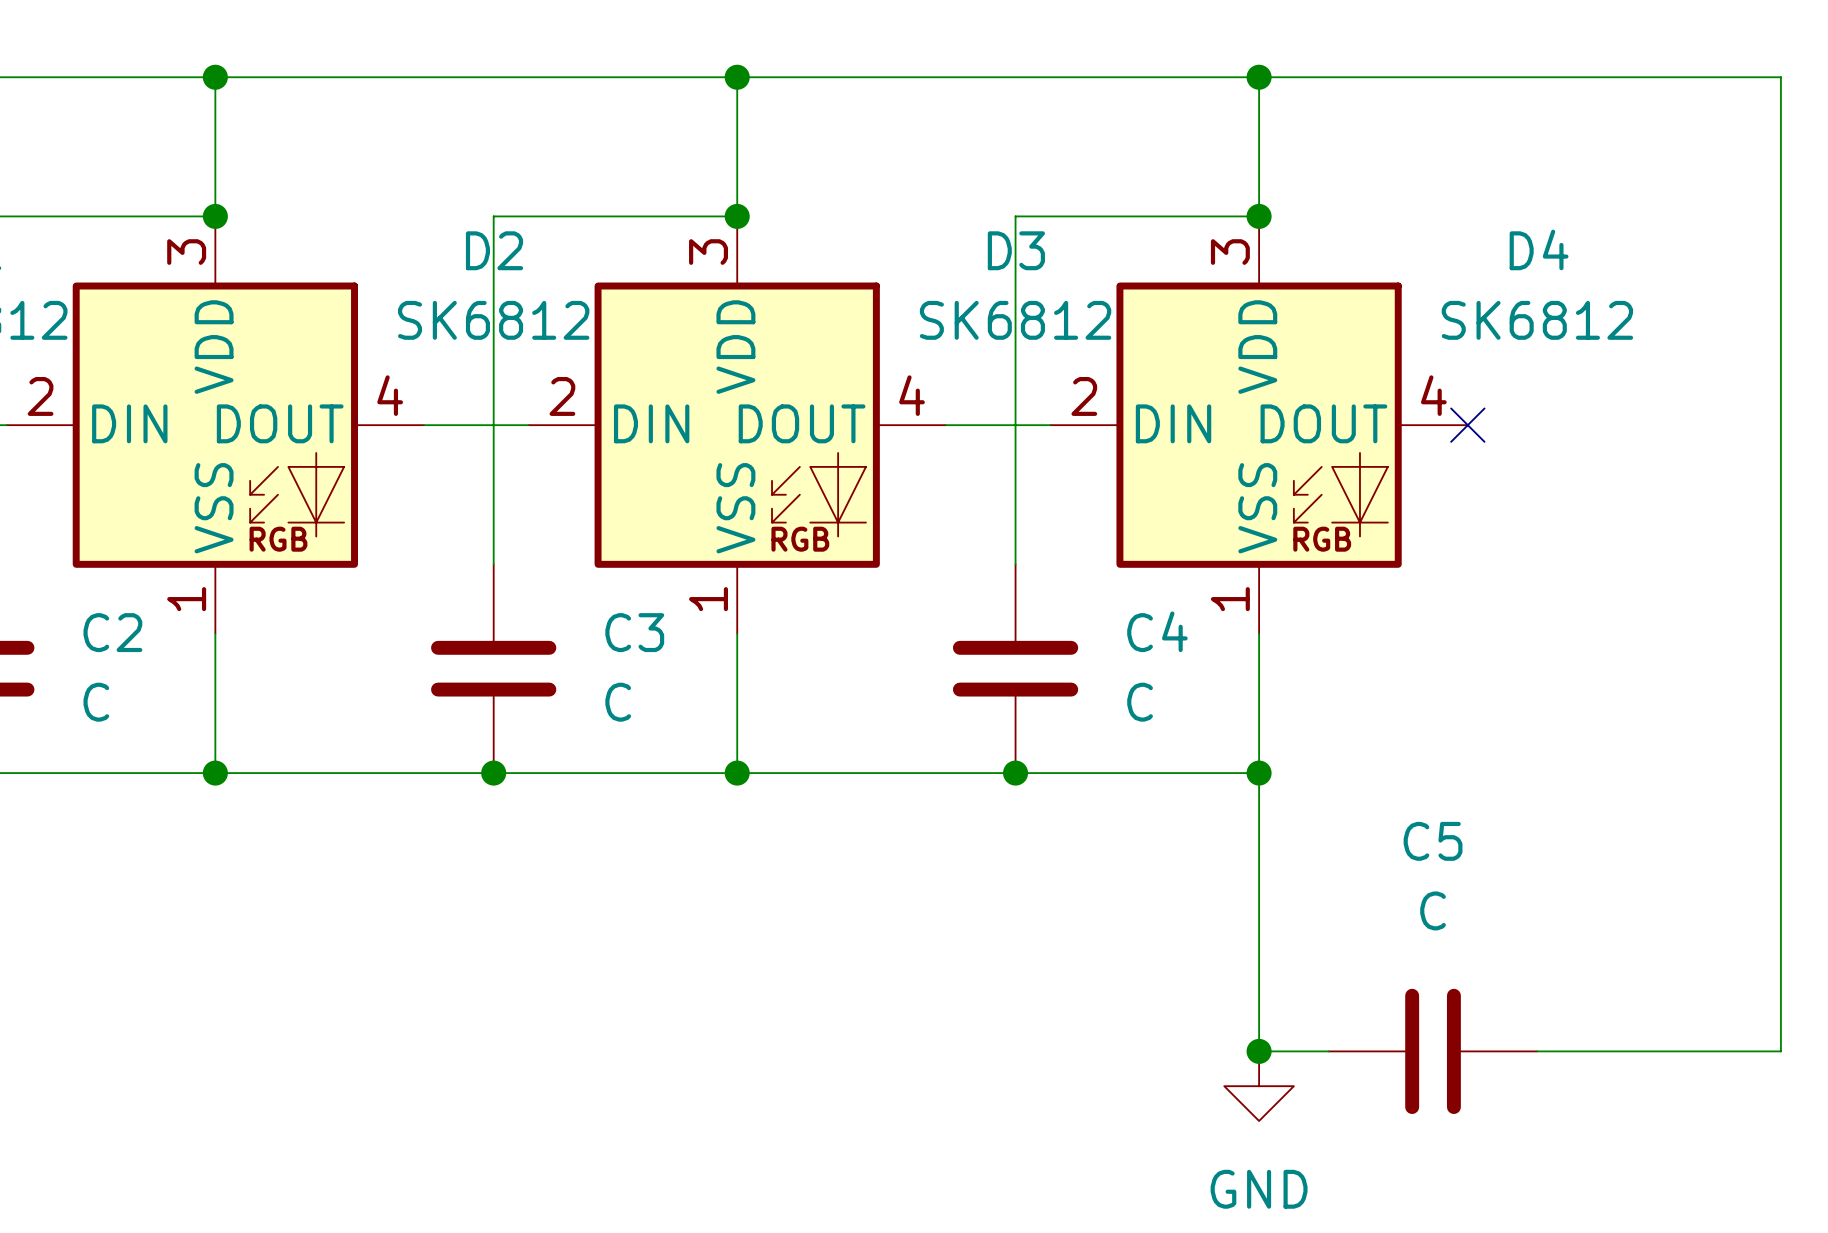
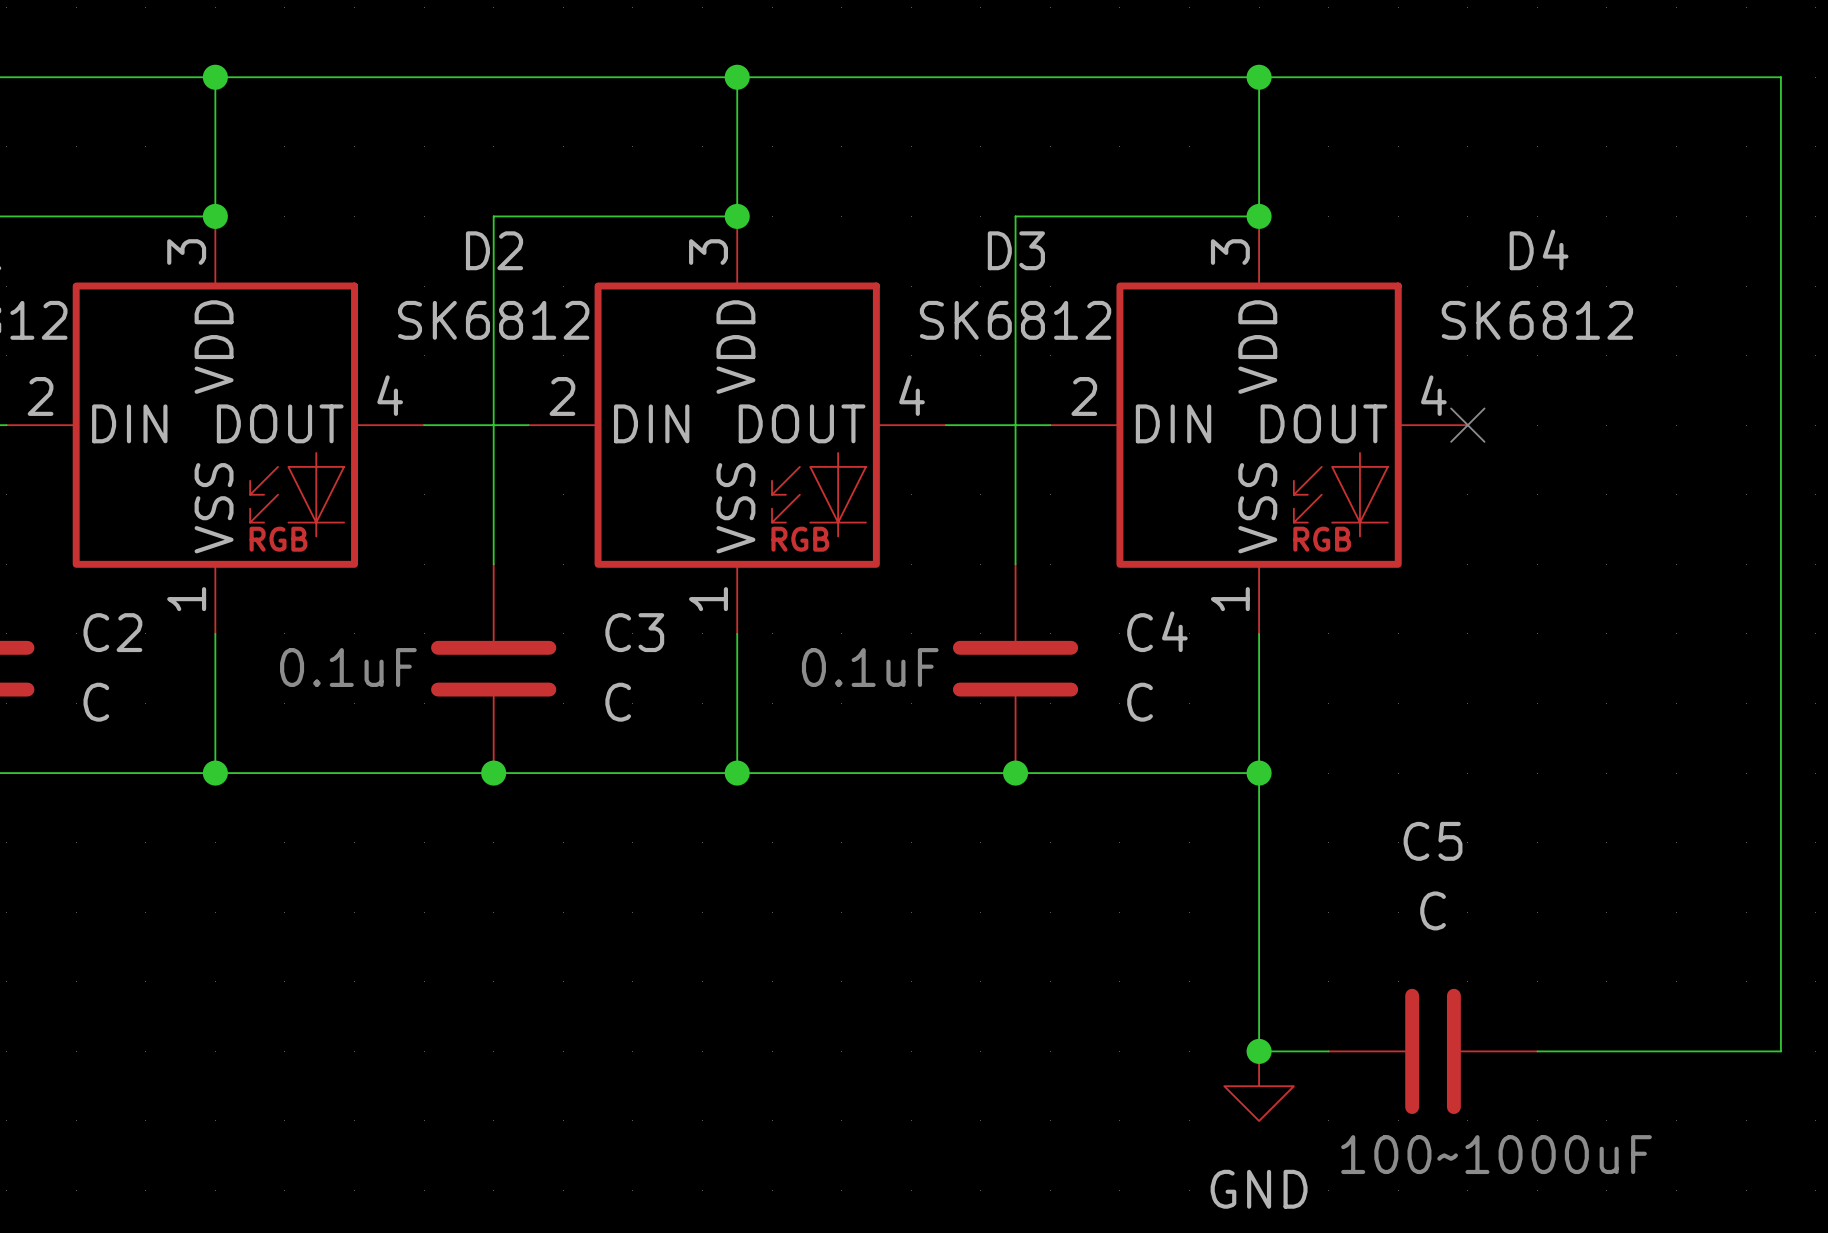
text: none -> 0.1uF (348, 667)
text: none -> 0.1uF (870, 667)
text: none -> 100~1000uF (1496, 1154)

